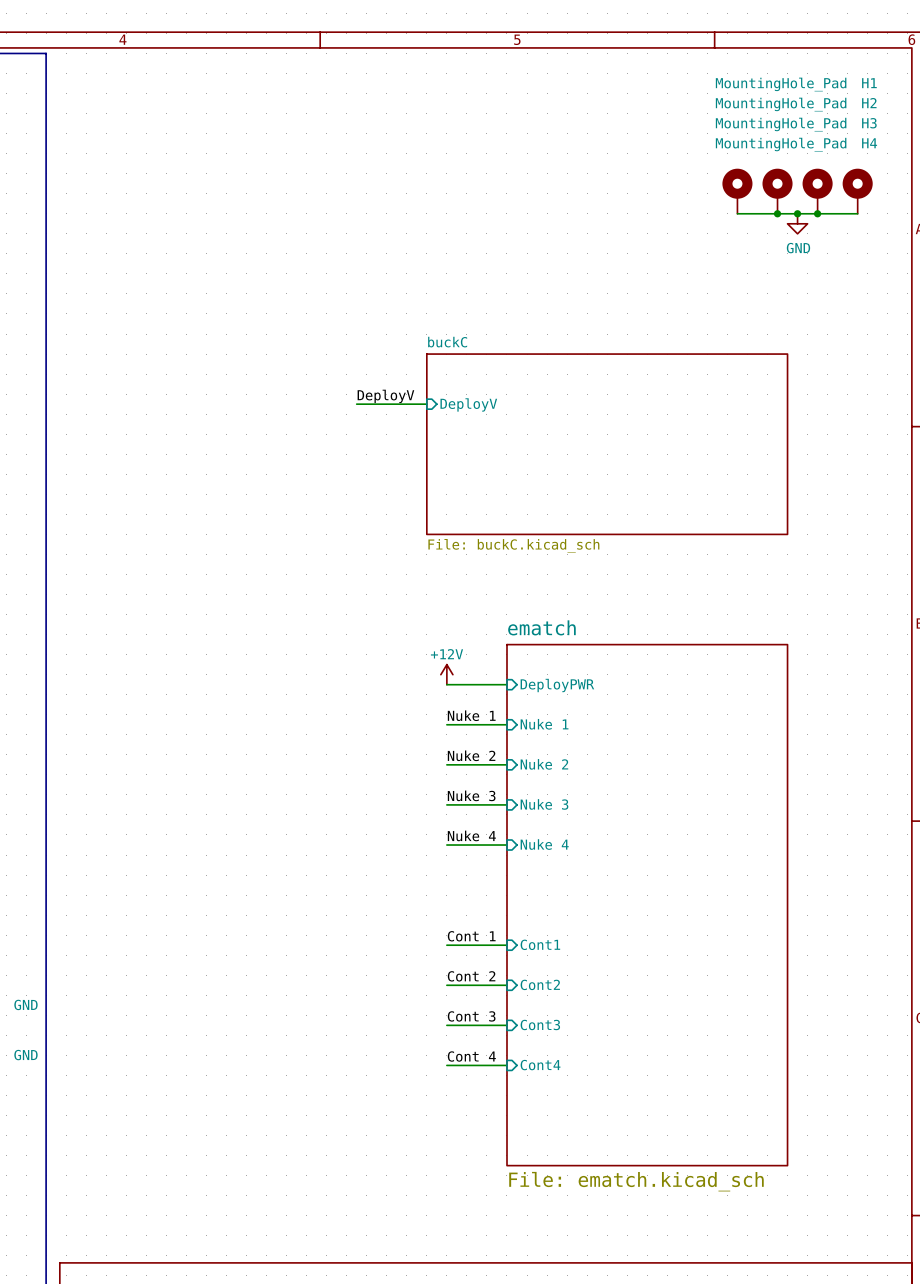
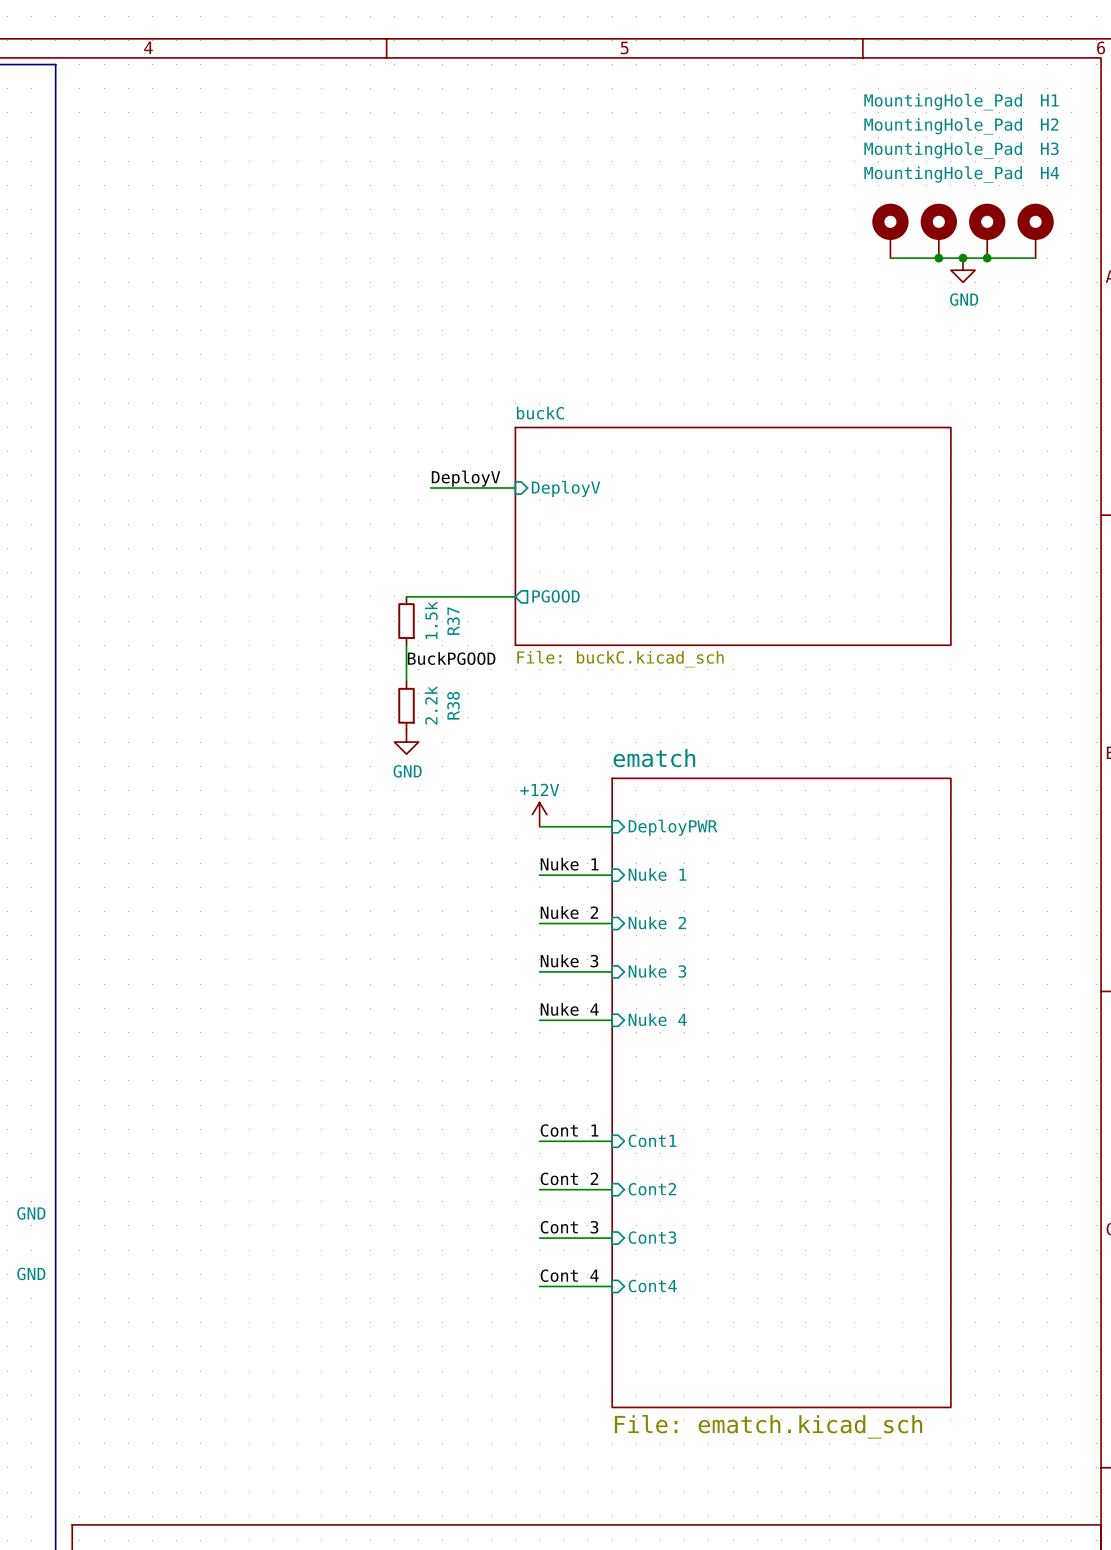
sheet pin: none -> PGOOD (556, 596)
wire: none -> (406, 596) (515, 596)
R37: none -> 1.5k (406, 621)
wire: none -> (406, 645) (406, 681)
label: none -> BuckPGOOD (451, 658)
R38: none -> 2.2k (406, 705)
power symbol: none -> GND (406, 742)

